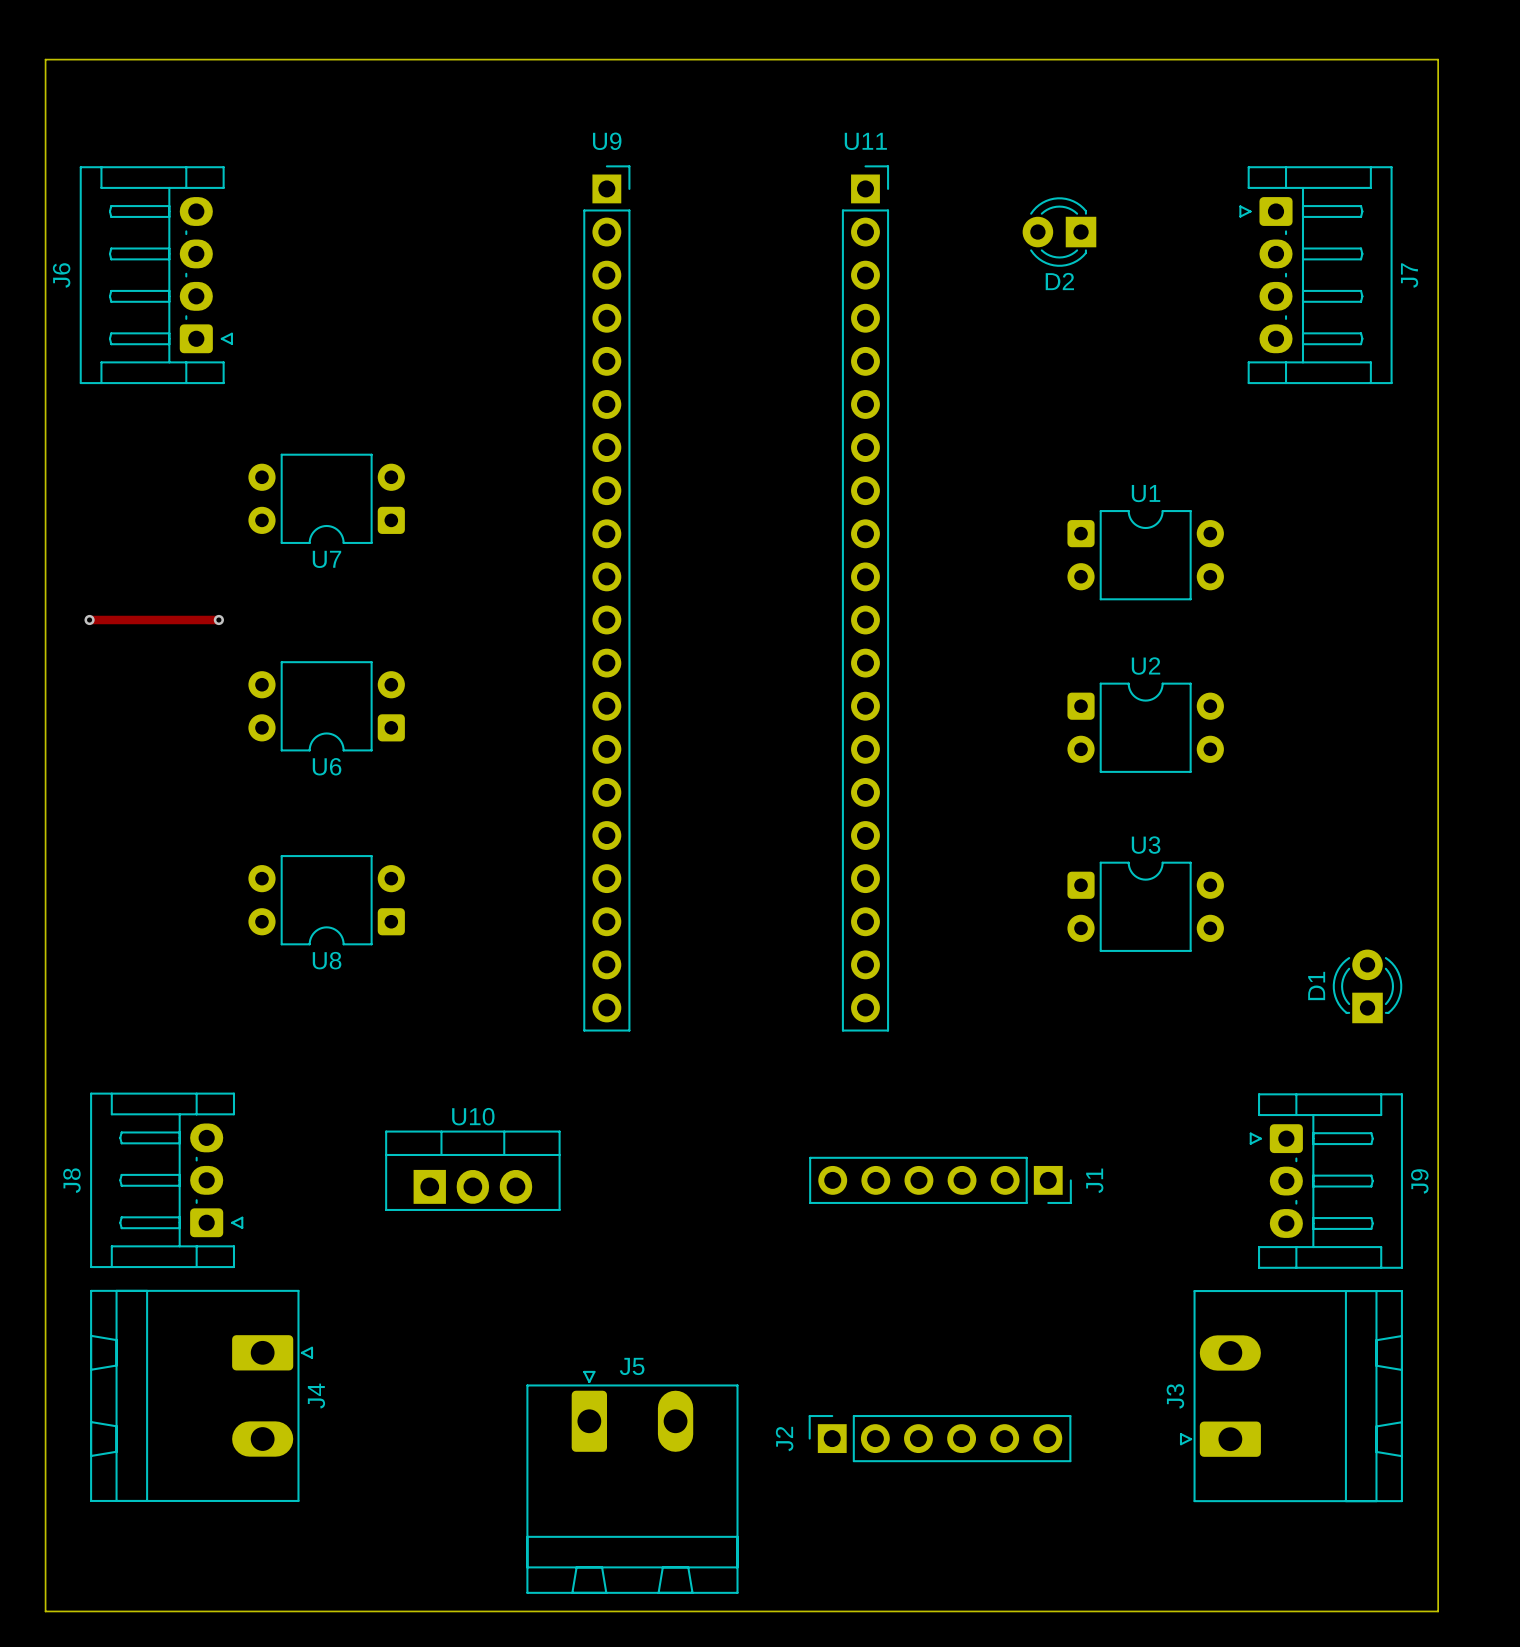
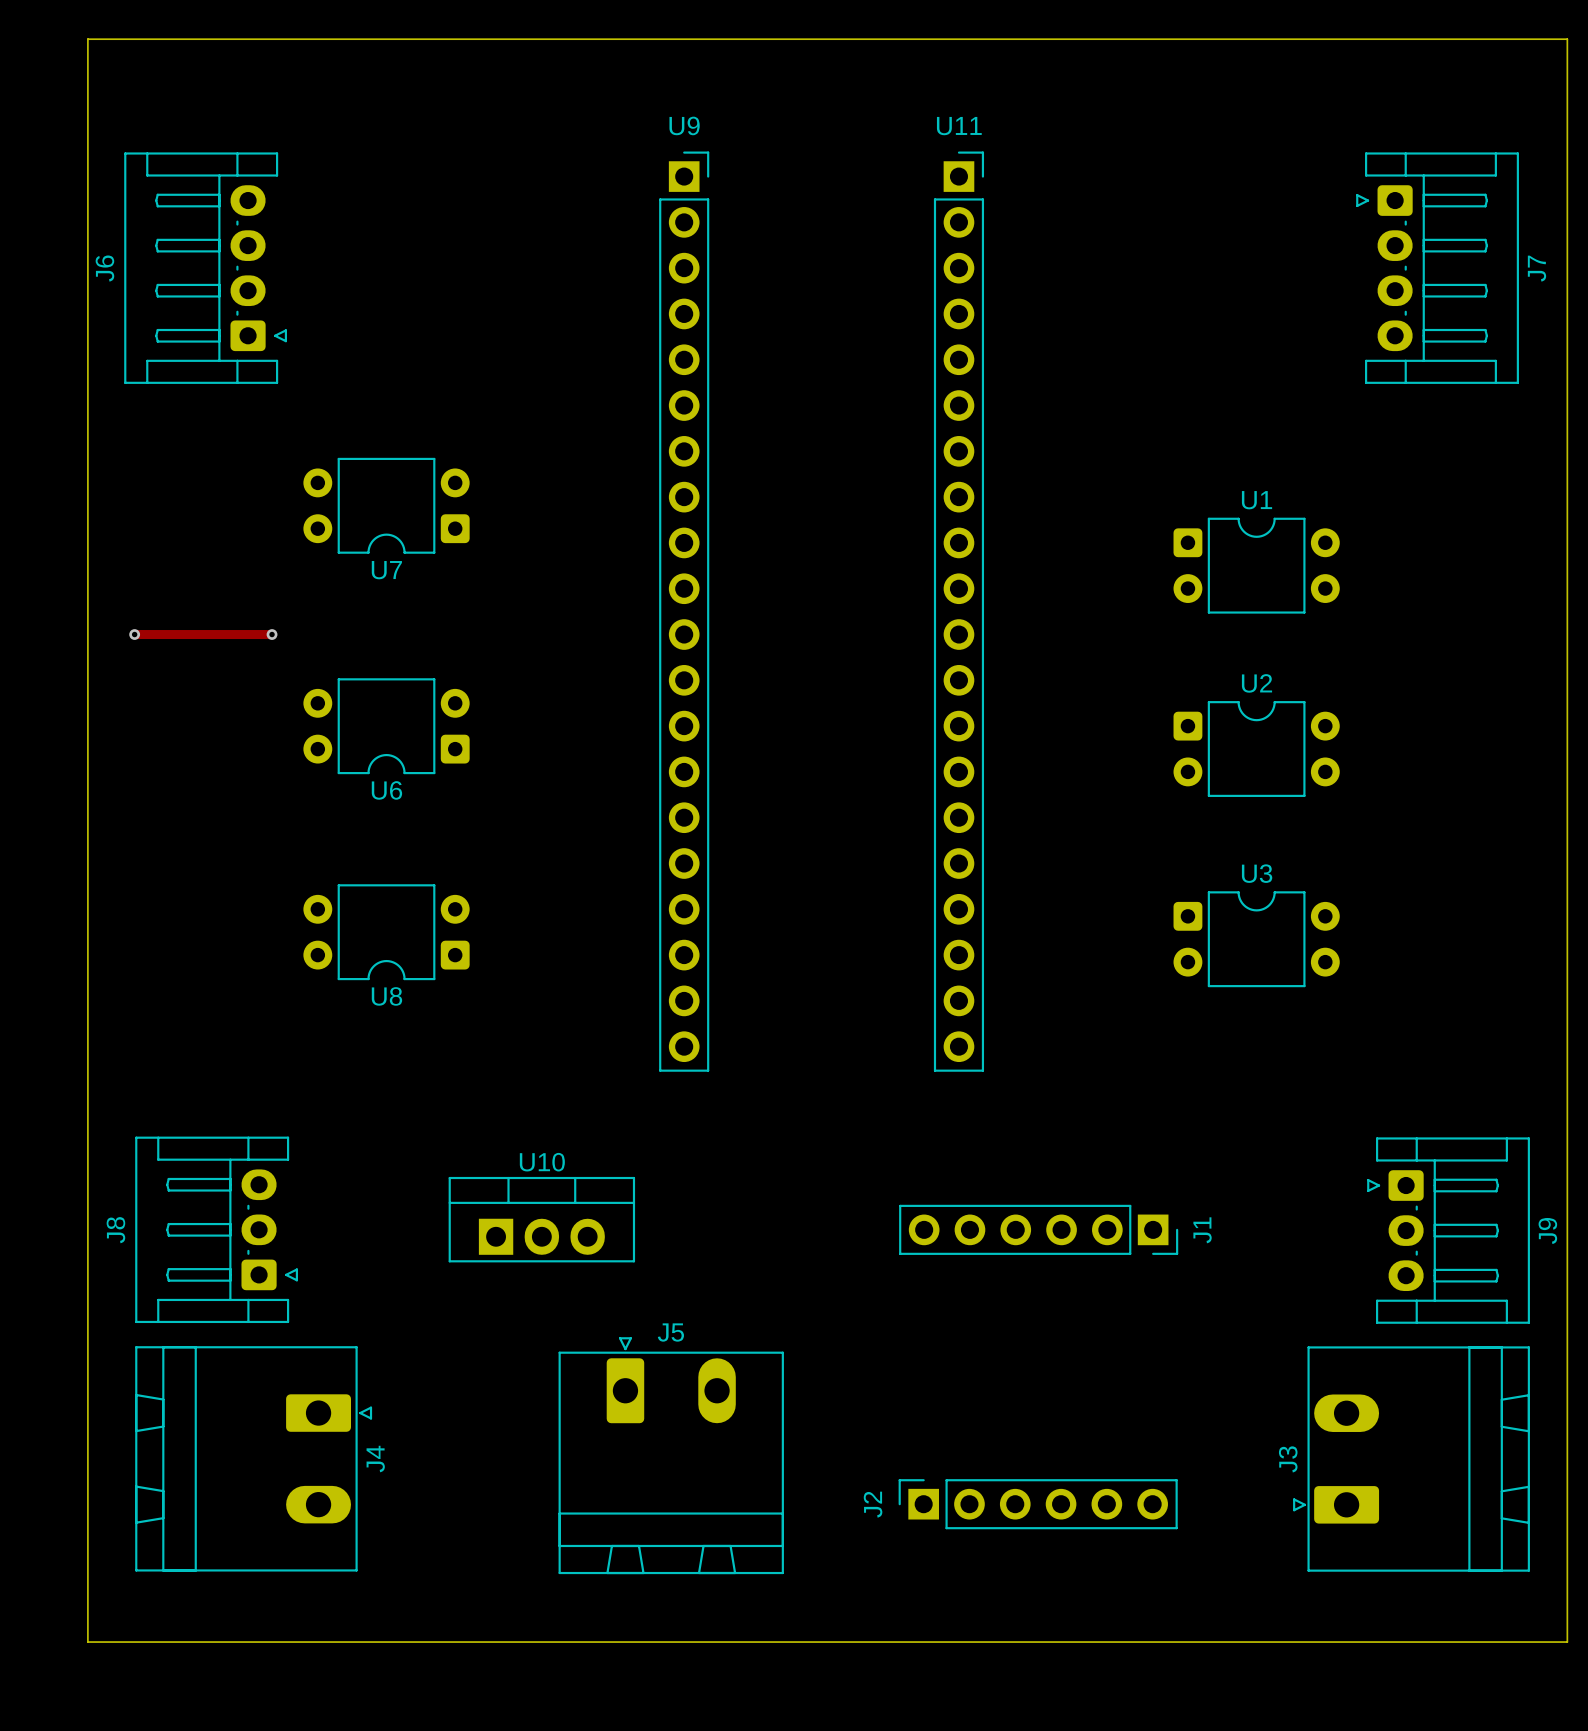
D2: (1059, 232) -> none
D1: (1367, 986) -> none
J5 position: (632, 1482) -> (671, 1455)
board edge: (45, 1568) (45, 1611) (1438, 1611) (1438, 1568) -> (87, 1642) (1567, 1642)

